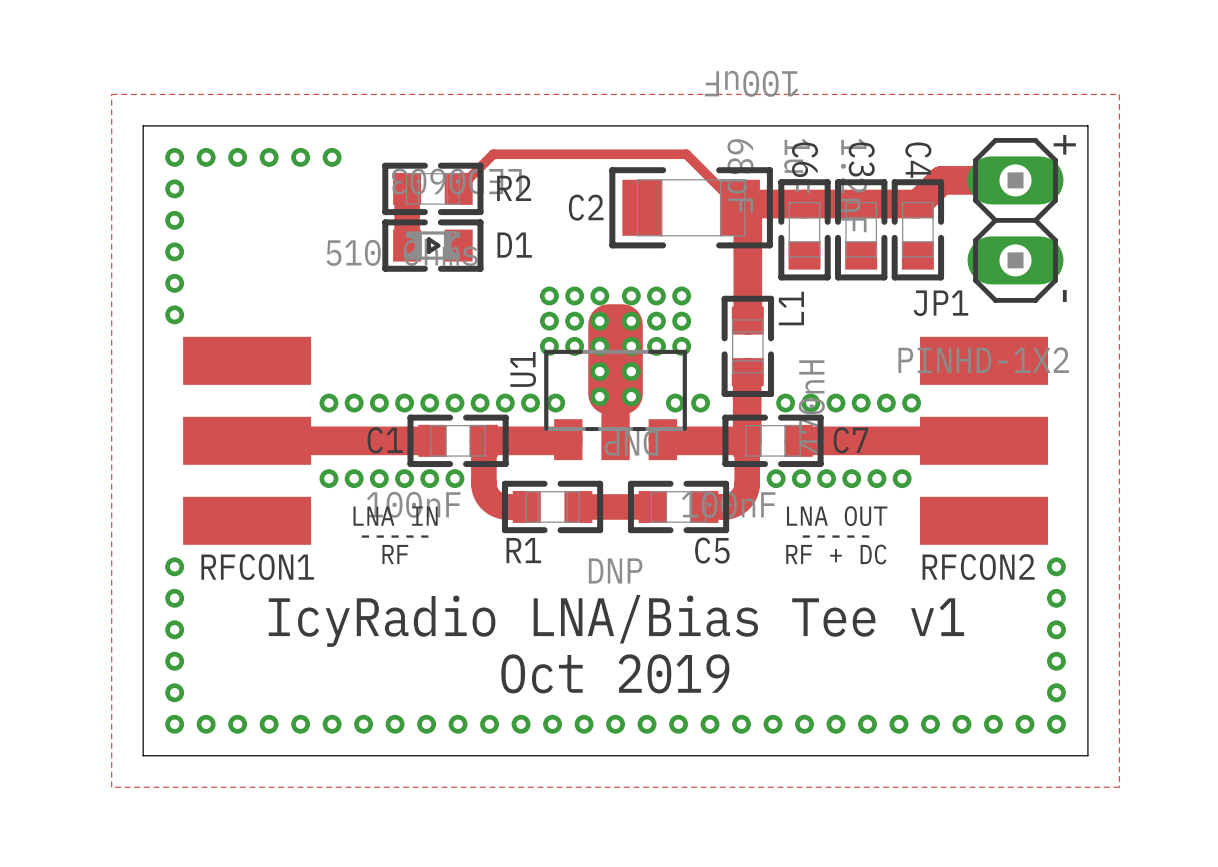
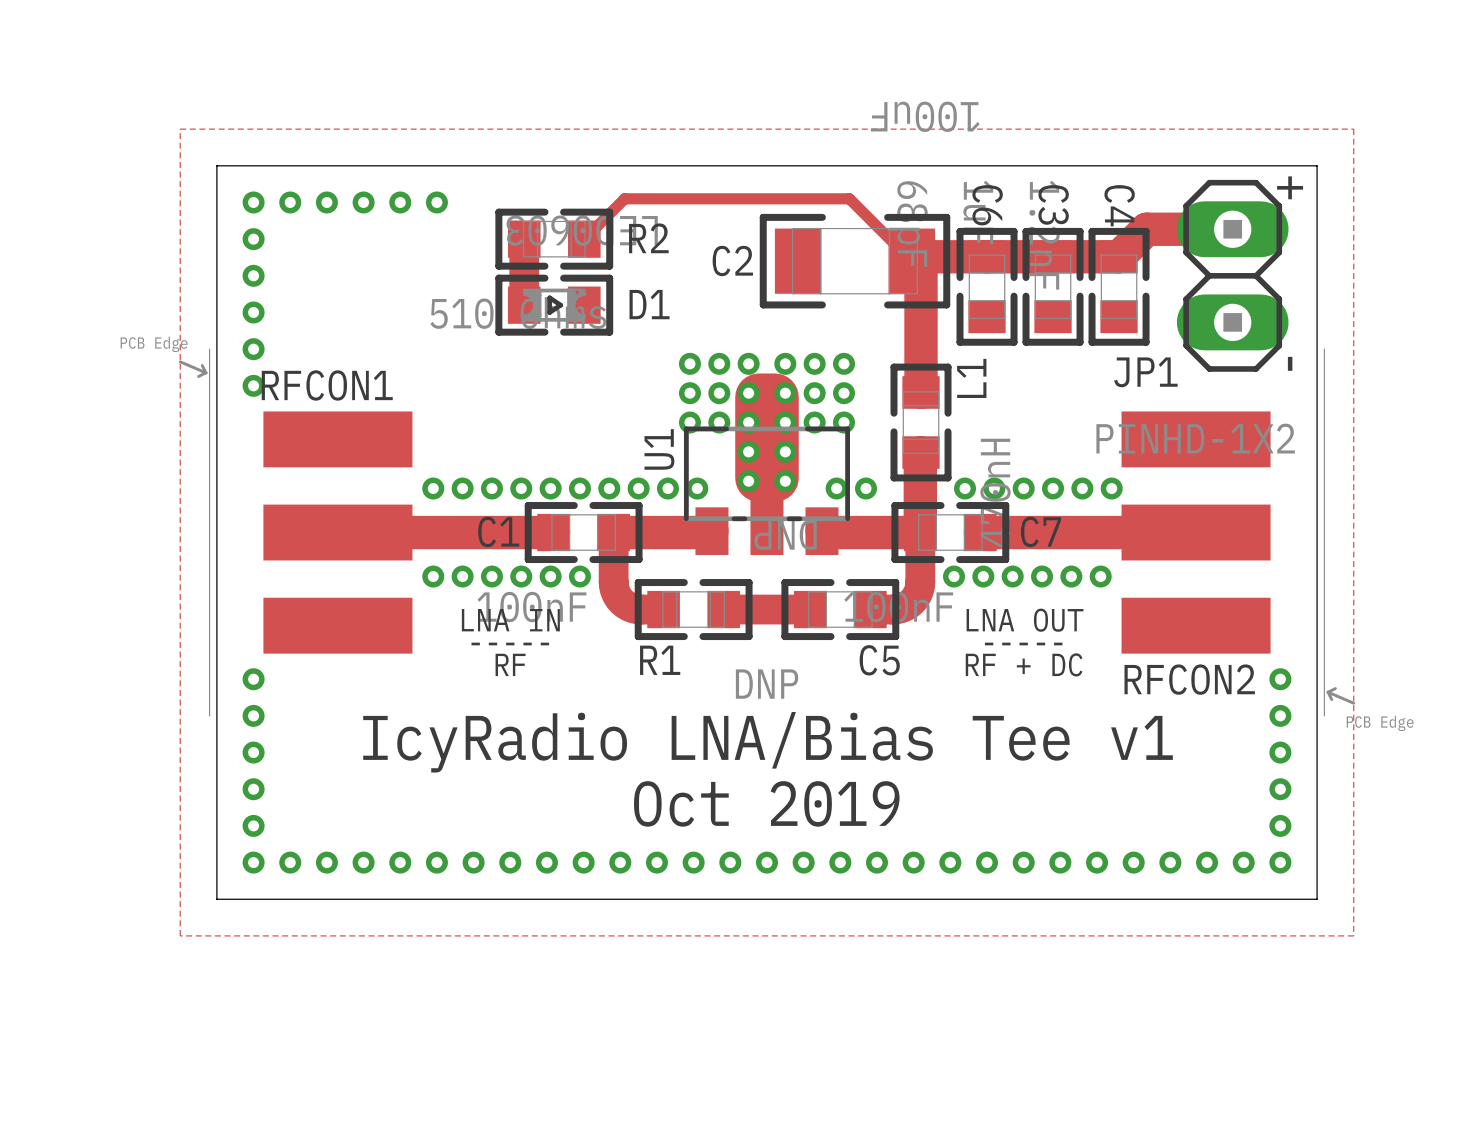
RFCON1 footprint: [183, 336, 312, 545] -> [178, 349, 413, 716]
RFCON2 footprint: [920, 336, 1049, 545] -> [1121, 349, 1356, 716]
RFCON1 name position: RFCON1 (257, 567) -> RFCON1 (327, 385)

